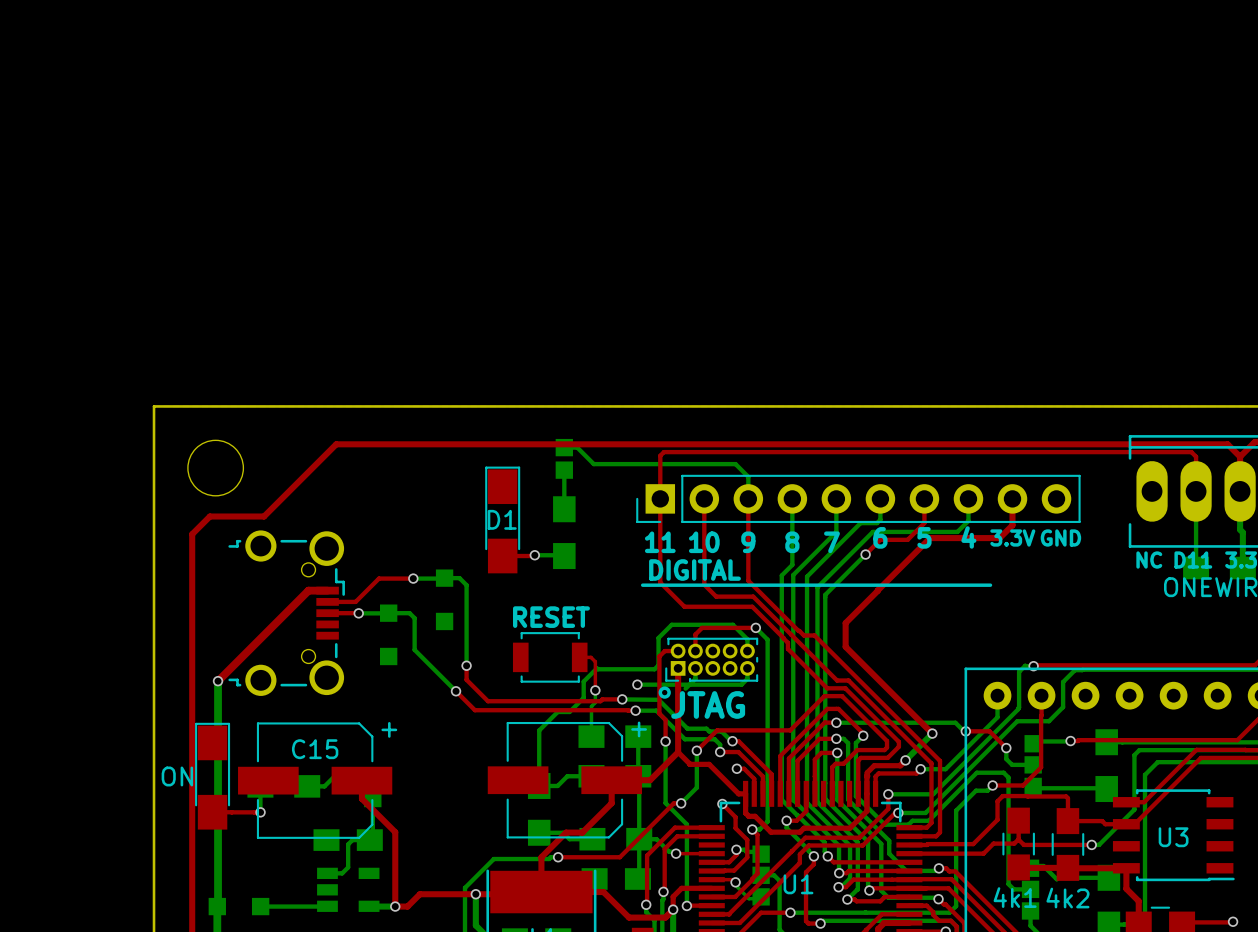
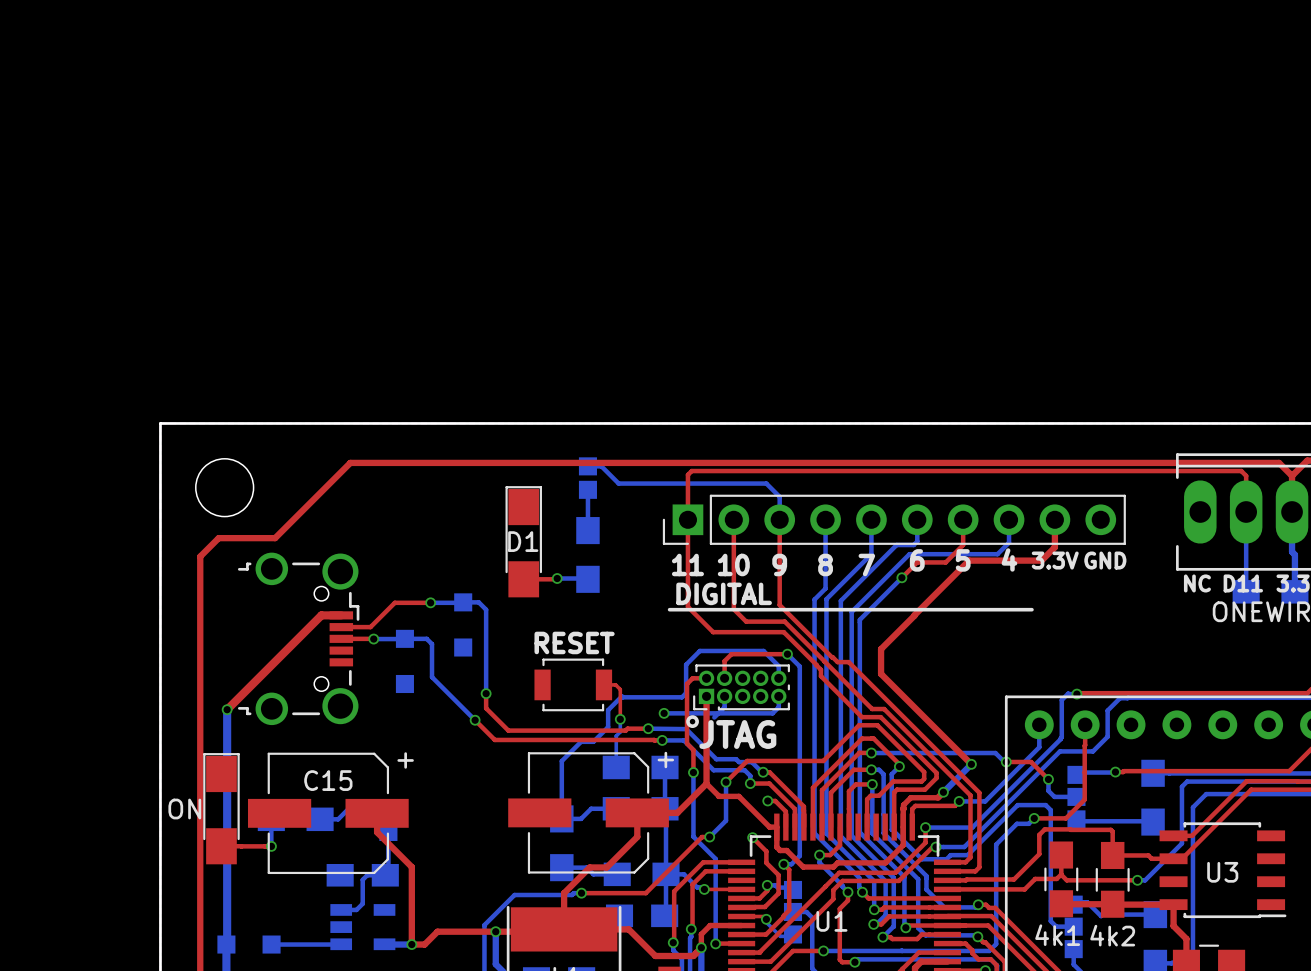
top track: (1233, 921) (1182, 922) -> none
via: (1233, 921) -> none

